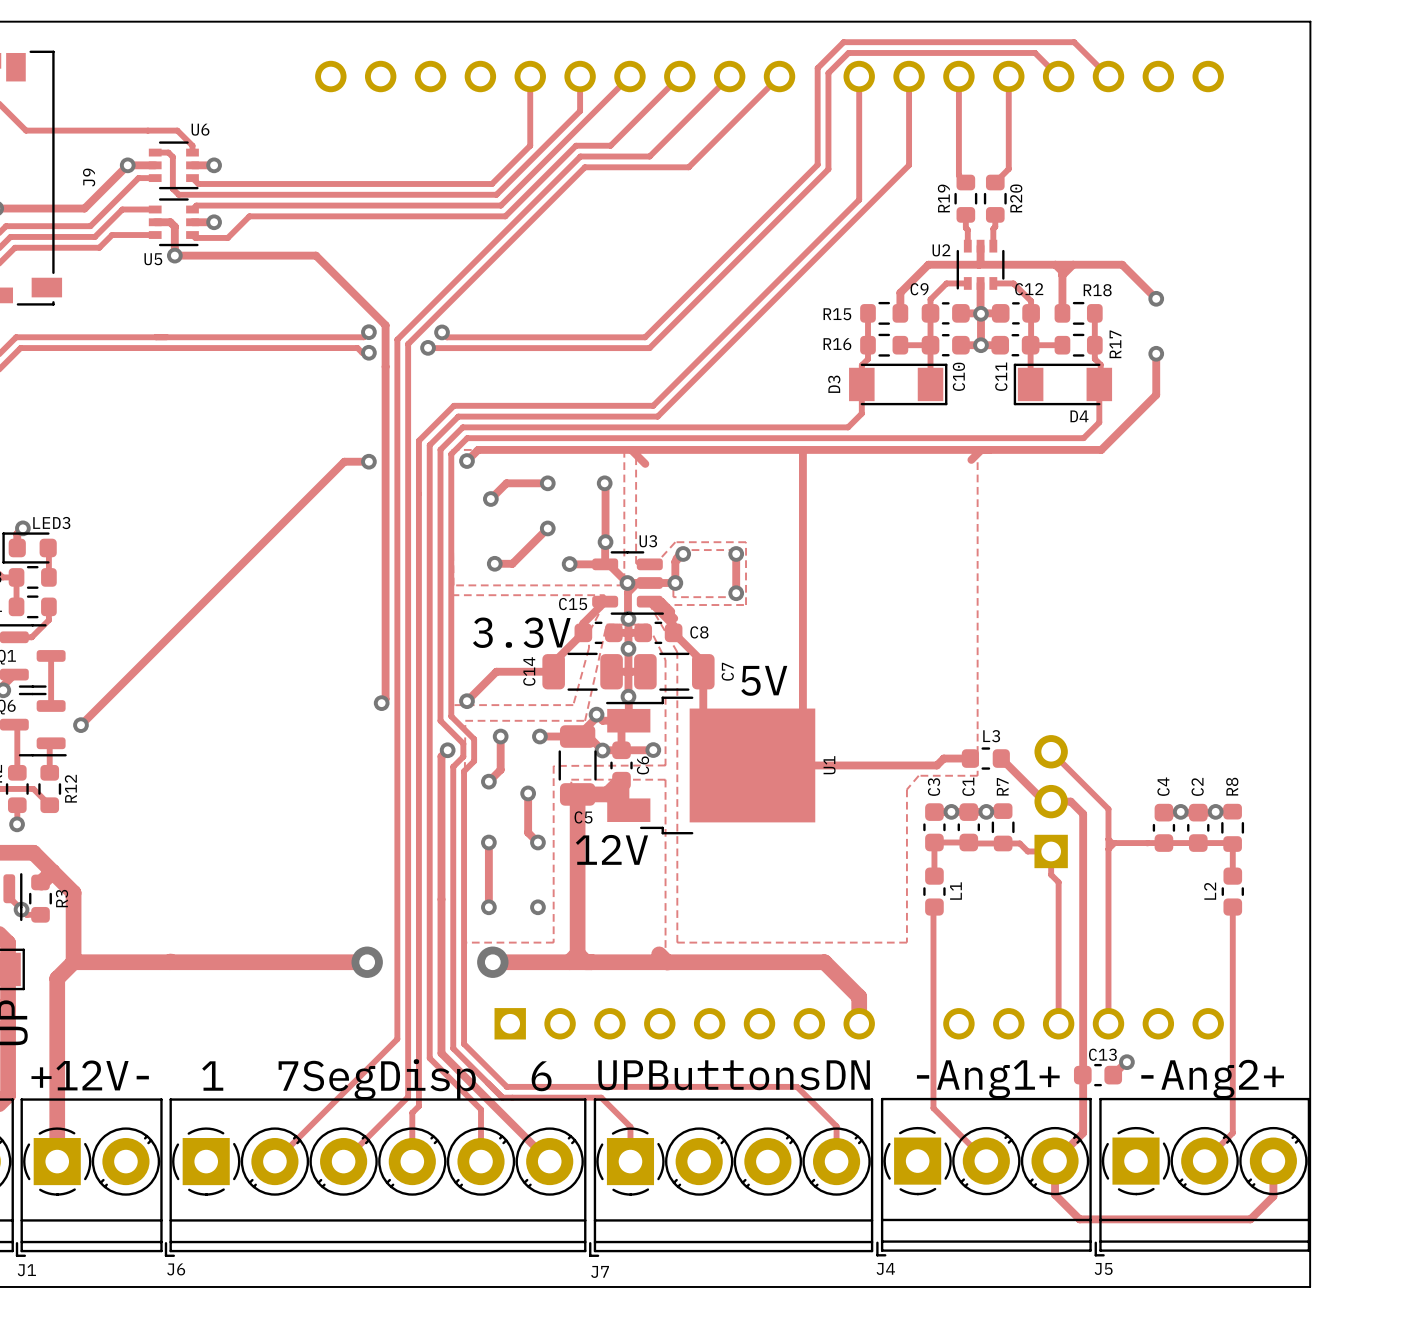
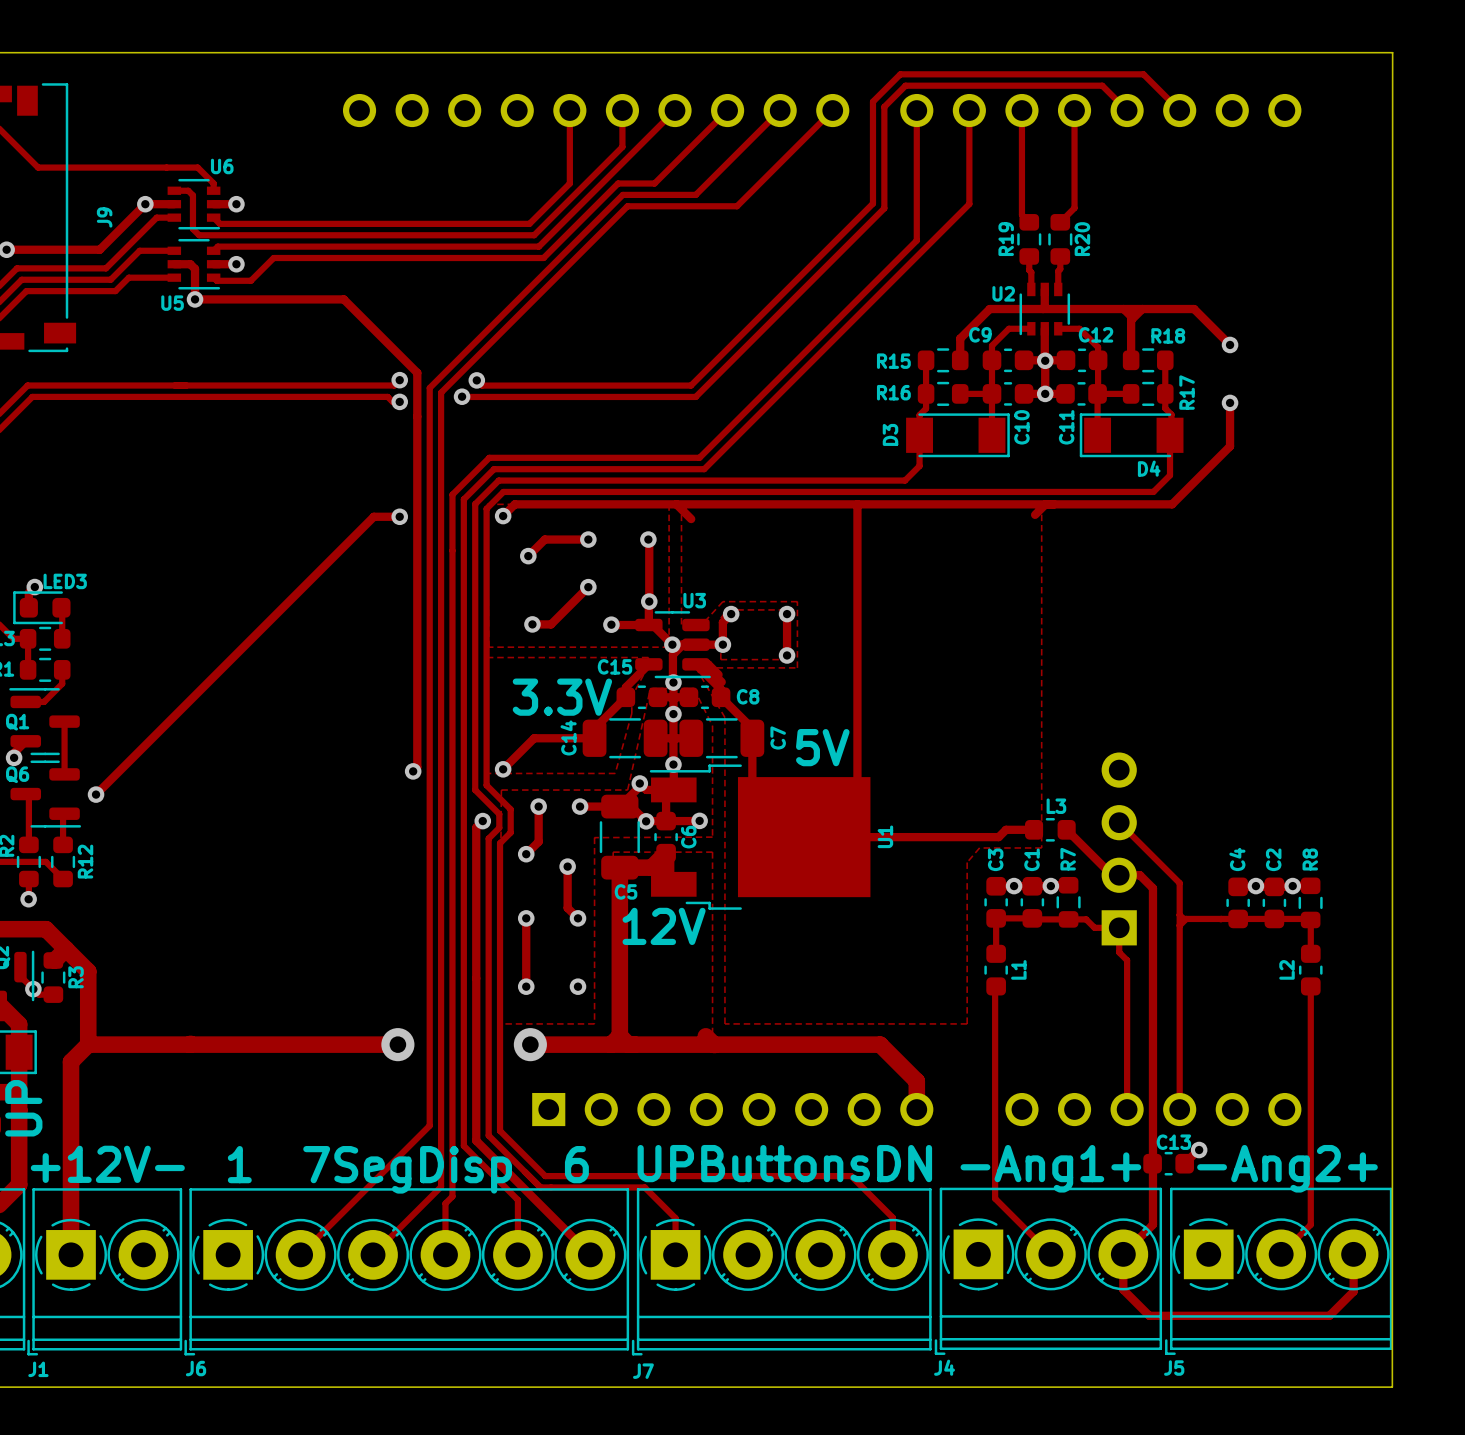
part: none -> (1119, 848)

